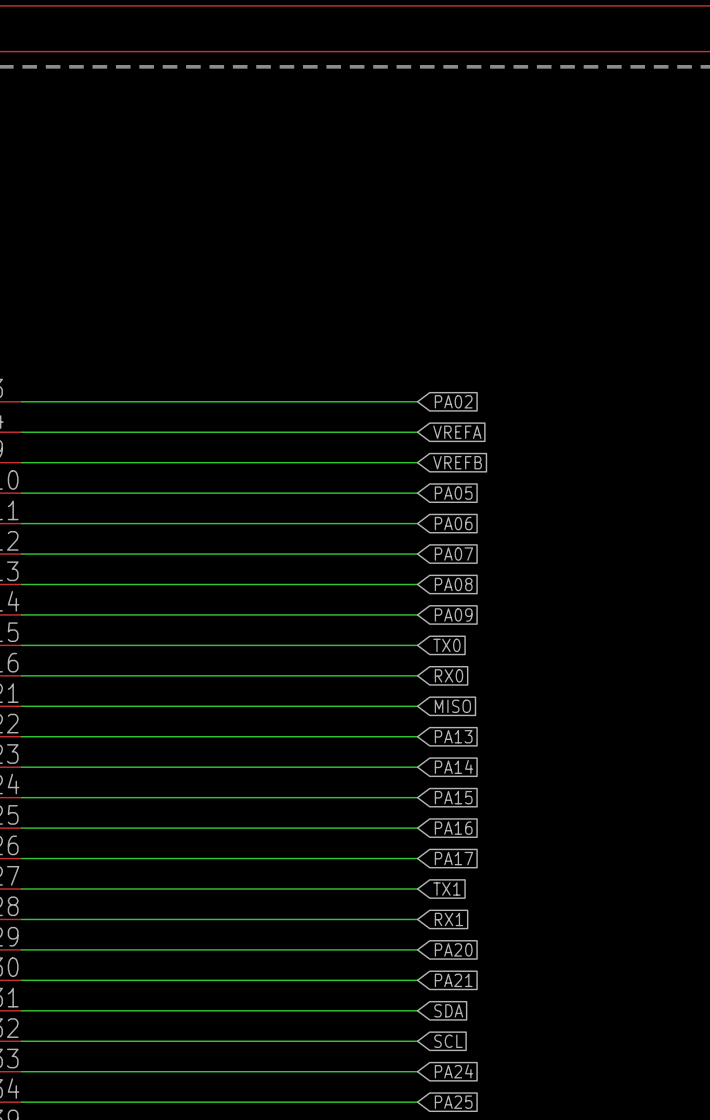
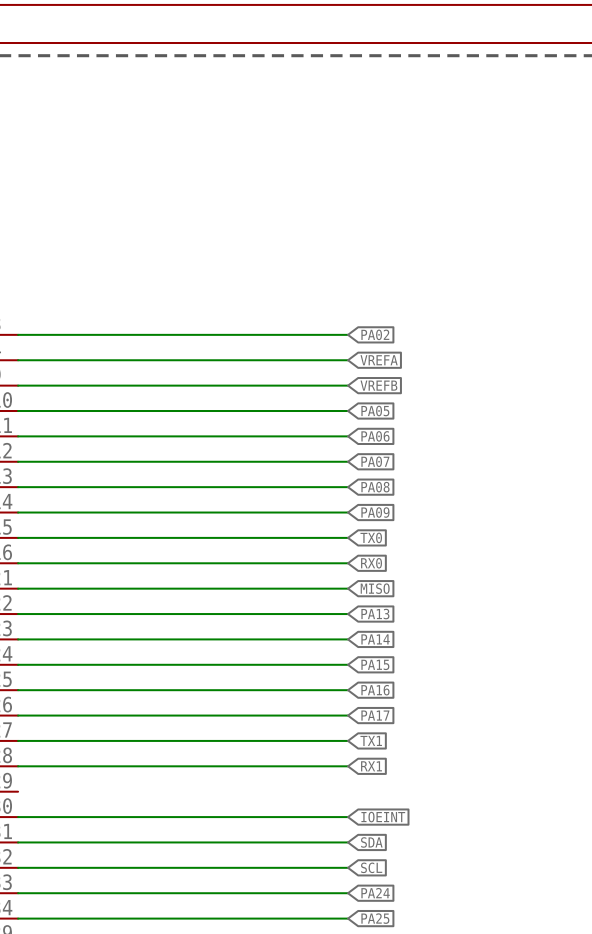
wire: (21, 949) (417, 949) -> none
global label: PA20 (453, 949) -> none
global label: PA21 (453, 980) -> IOEINT (383, 817)

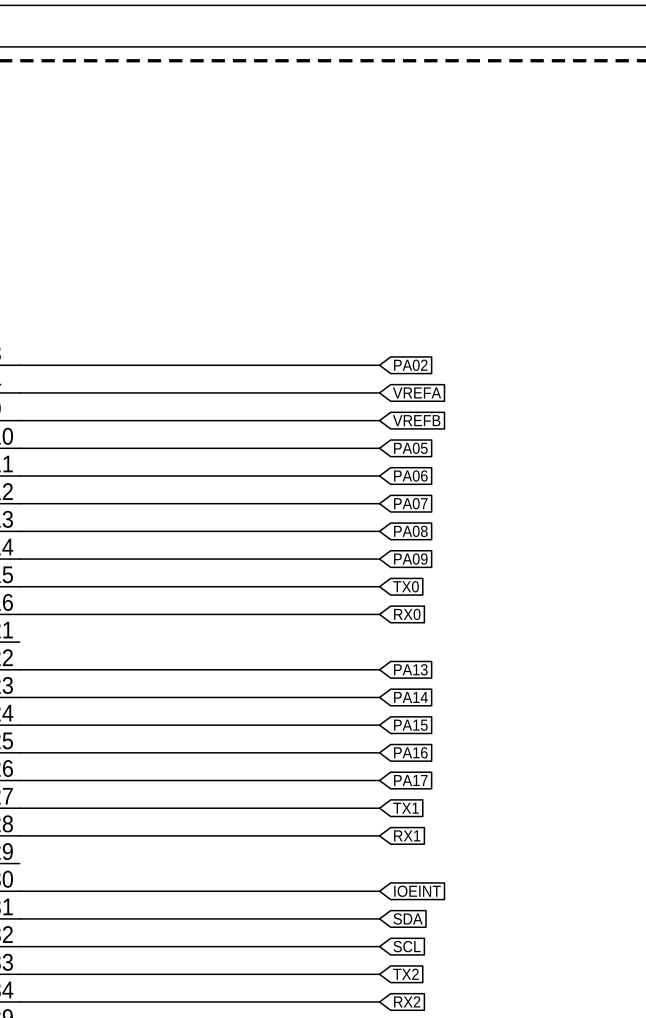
wire: (18, 588) (348, 588) -> none
global label: MISO (375, 588) -> none
global label: PA24 (375, 893) -> TX2 (405, 974)
global label: PA25 (375, 918) -> RX2 (407, 1001)

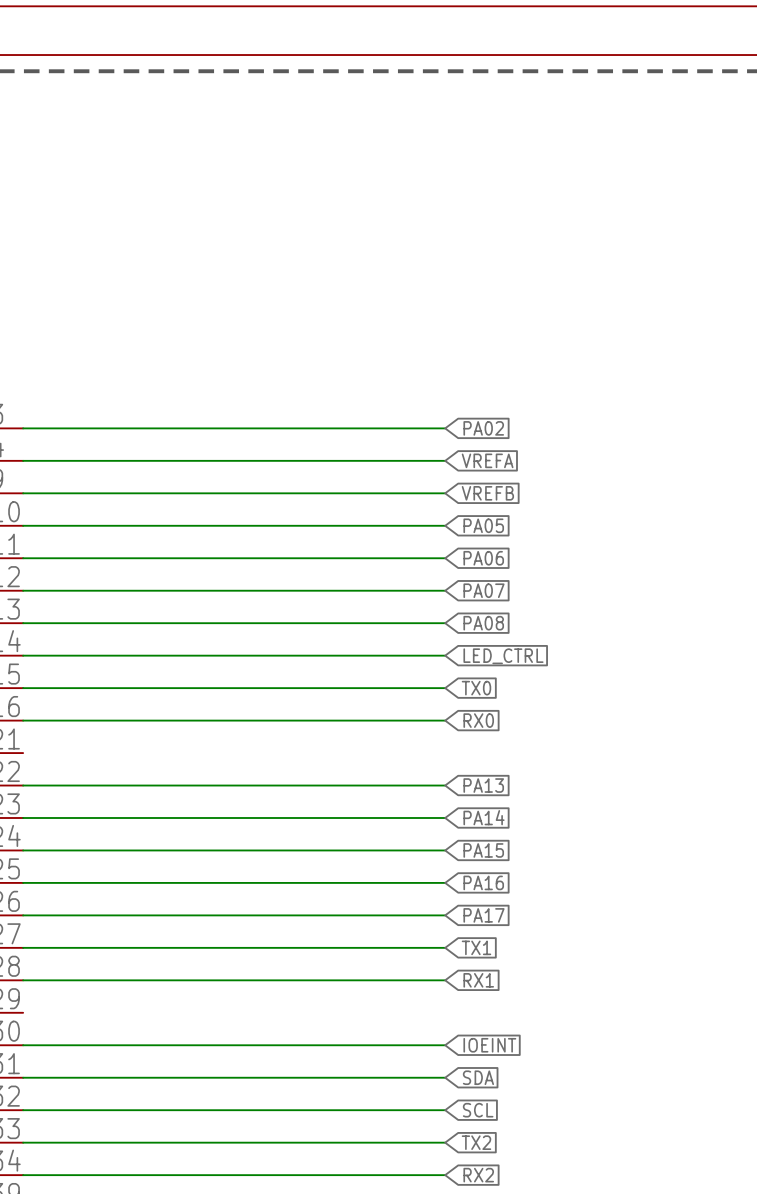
global label: PA09 (410, 559) -> LED_CTRL (503, 656)

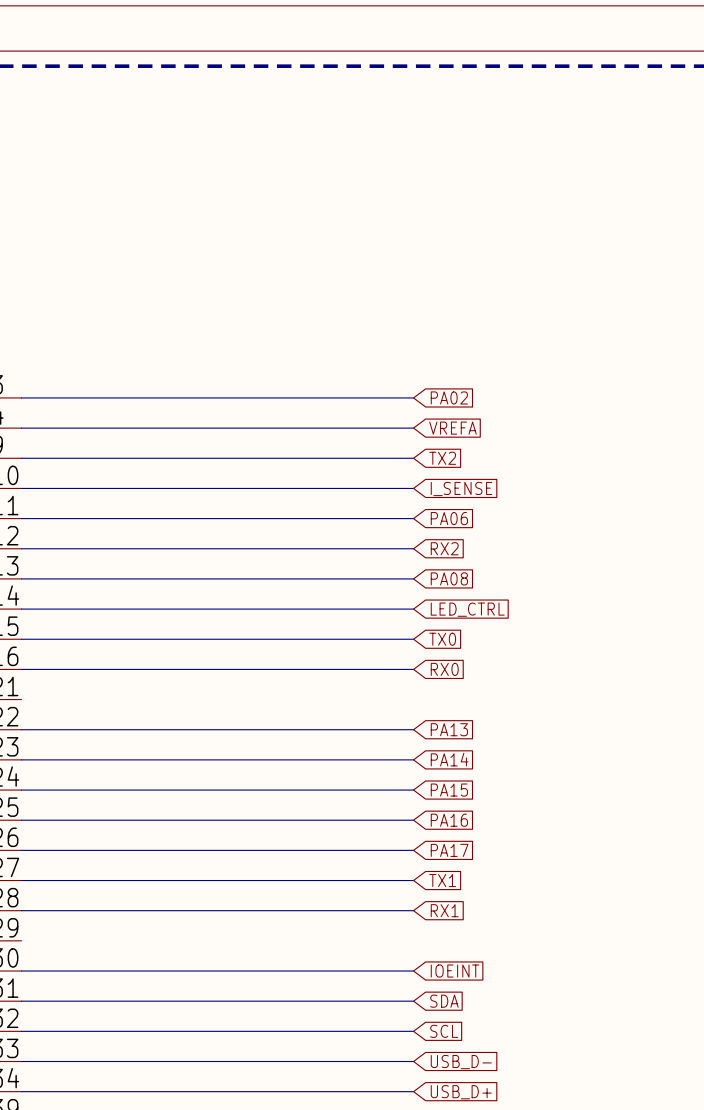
global label: VREFB (487, 493) -> TX2 (442, 458)
global label: PA05 (483, 525) -> I_SENSE (461, 489)
global label: PA07 (484, 590) -> RX2 (444, 548)
global label: TX2 (476, 1142) -> USB_D- (461, 1062)
global label: RX2 (478, 1175) -> USB_D+ (461, 1092)

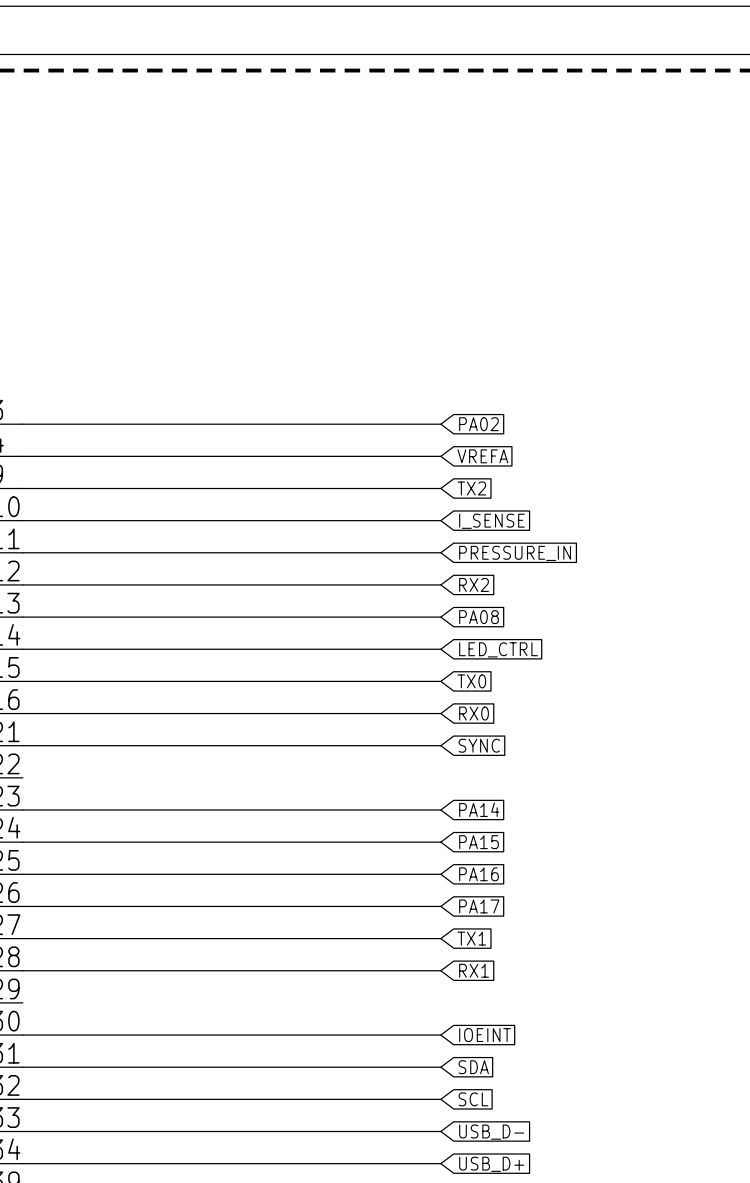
global label: PA06 (449, 518) -> PRESSURE_IN (515, 553)
global label: none -> SYNC (479, 745)
wire: (21, 729) (413, 729) -> (22, 745) (440, 745)
global label: PA13 (449, 729) -> none

